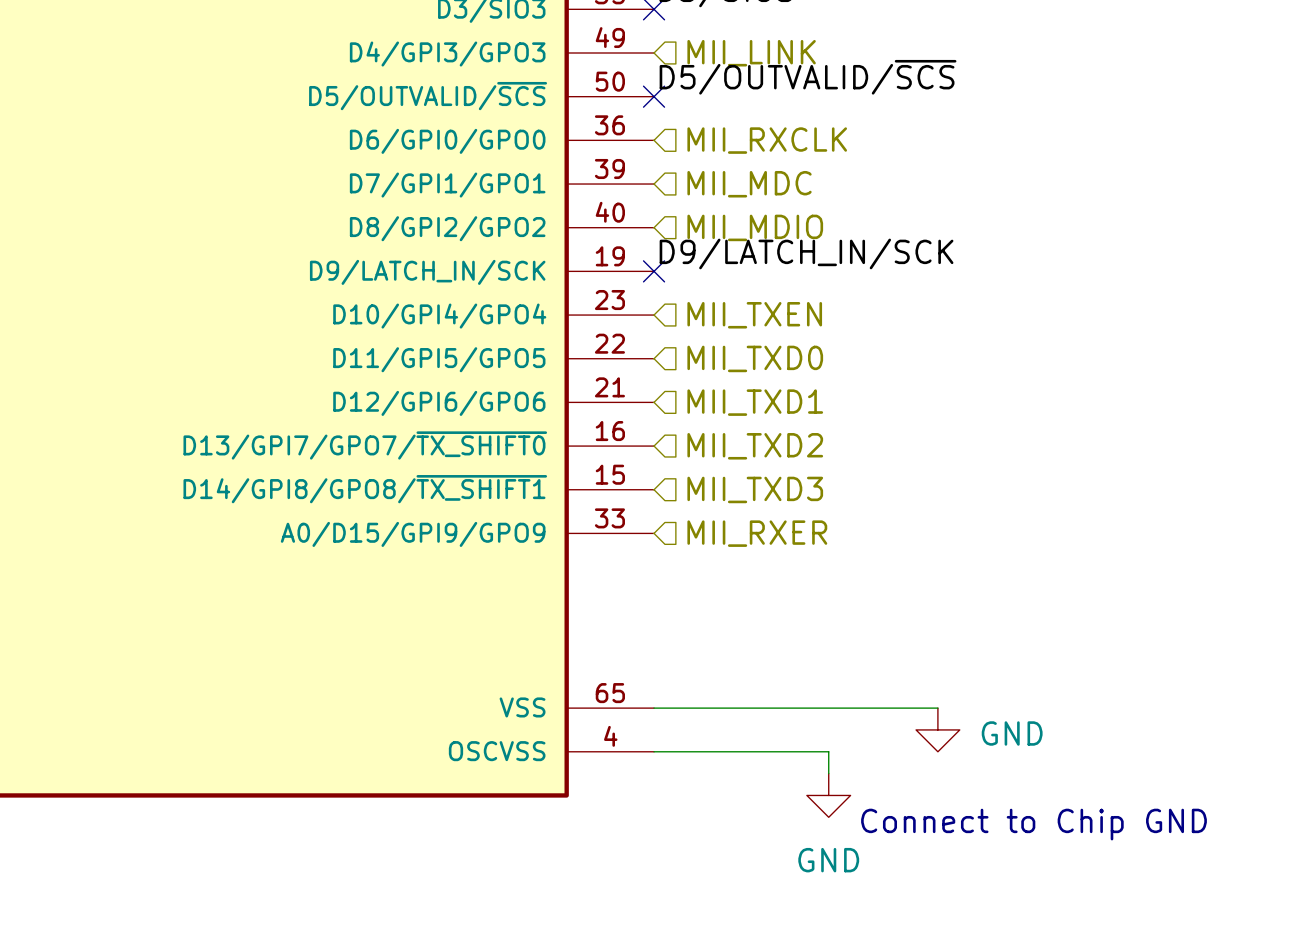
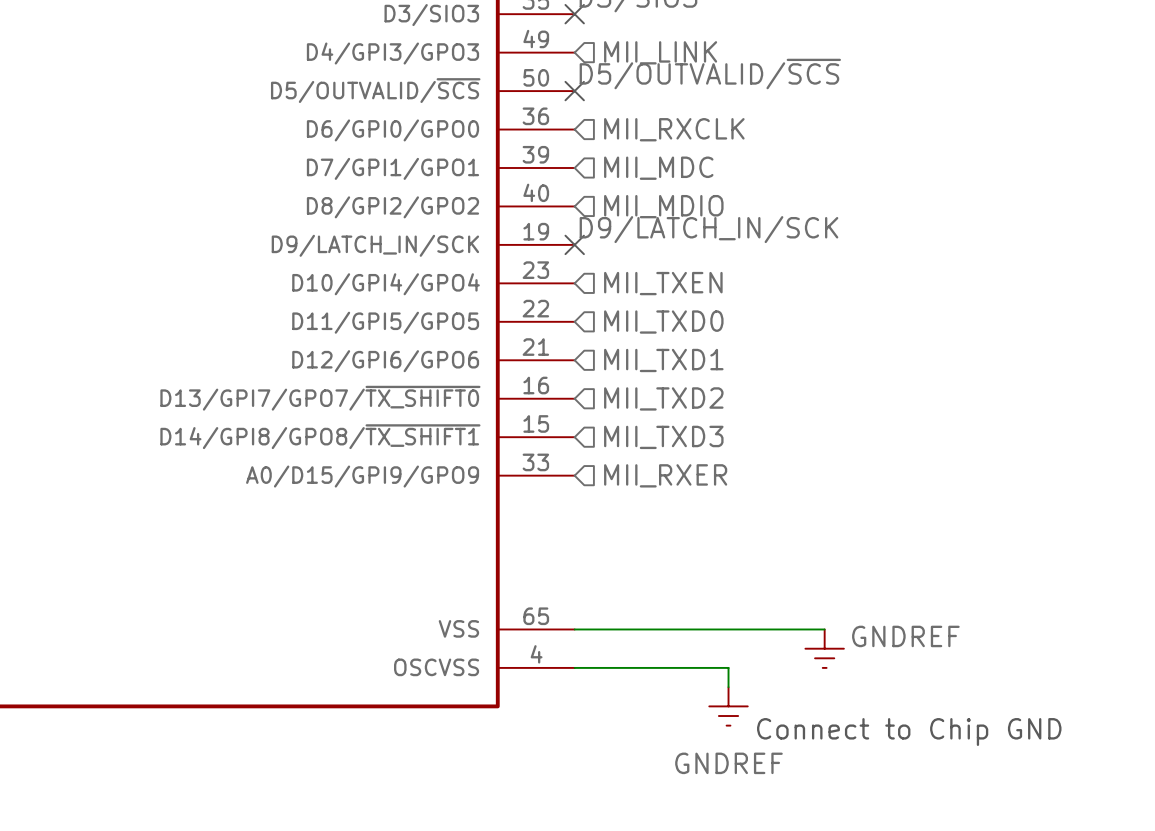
power symbol: GND (937, 729) -> GNDREF (824, 648)
power symbol: GND (828, 795) -> GNDREF (728, 706)

